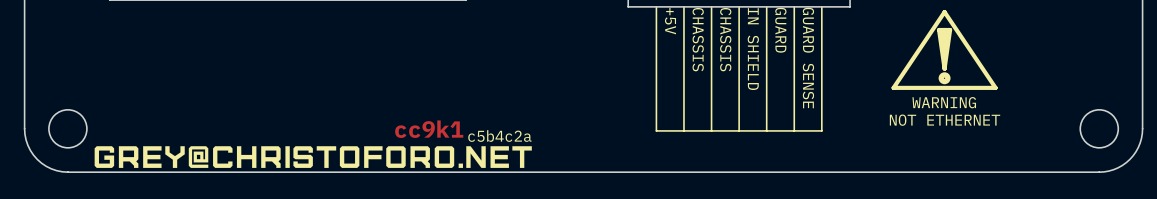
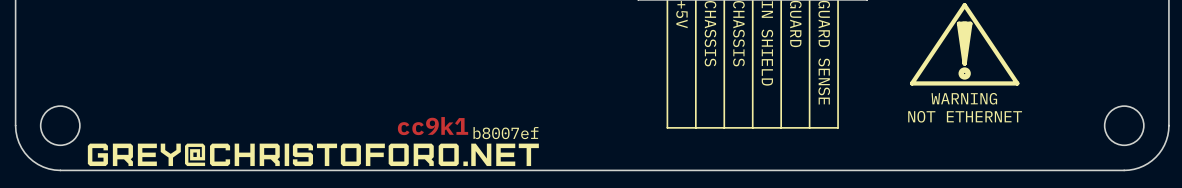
text: c5b4c2a (499, 136) -> b8007ef (505, 133)

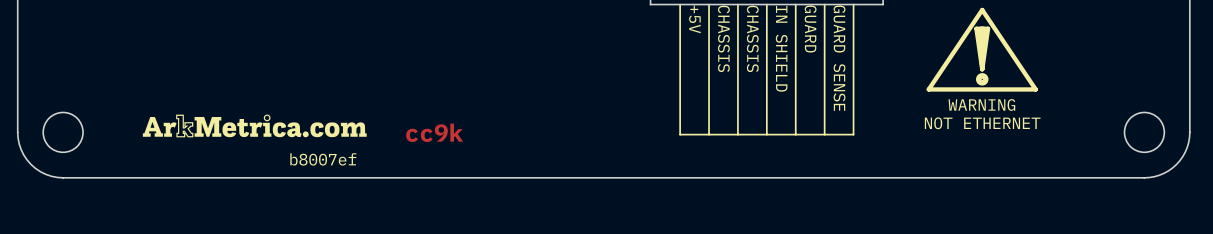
drawing: none -> [142, 114, 367, 138]
text: cc9k1 (433, 126) -> cc9k (434, 132)
text position: b8007ef (505, 133) -> b8007ef (323, 159)
drawing: [87, 143, 539, 167] -> none

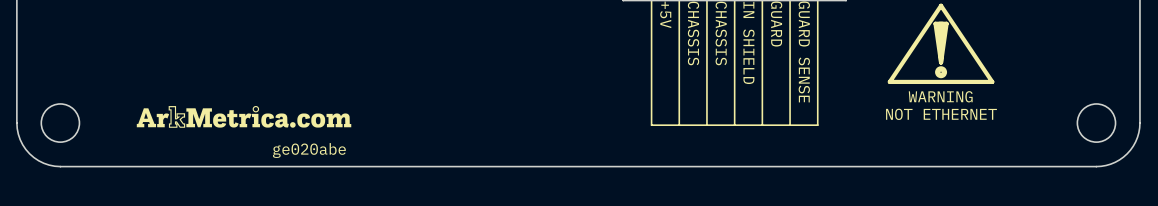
text: cc9k (434, 132) -> none
text: b8007ef (323, 159) -> ge020abe (309, 150)

